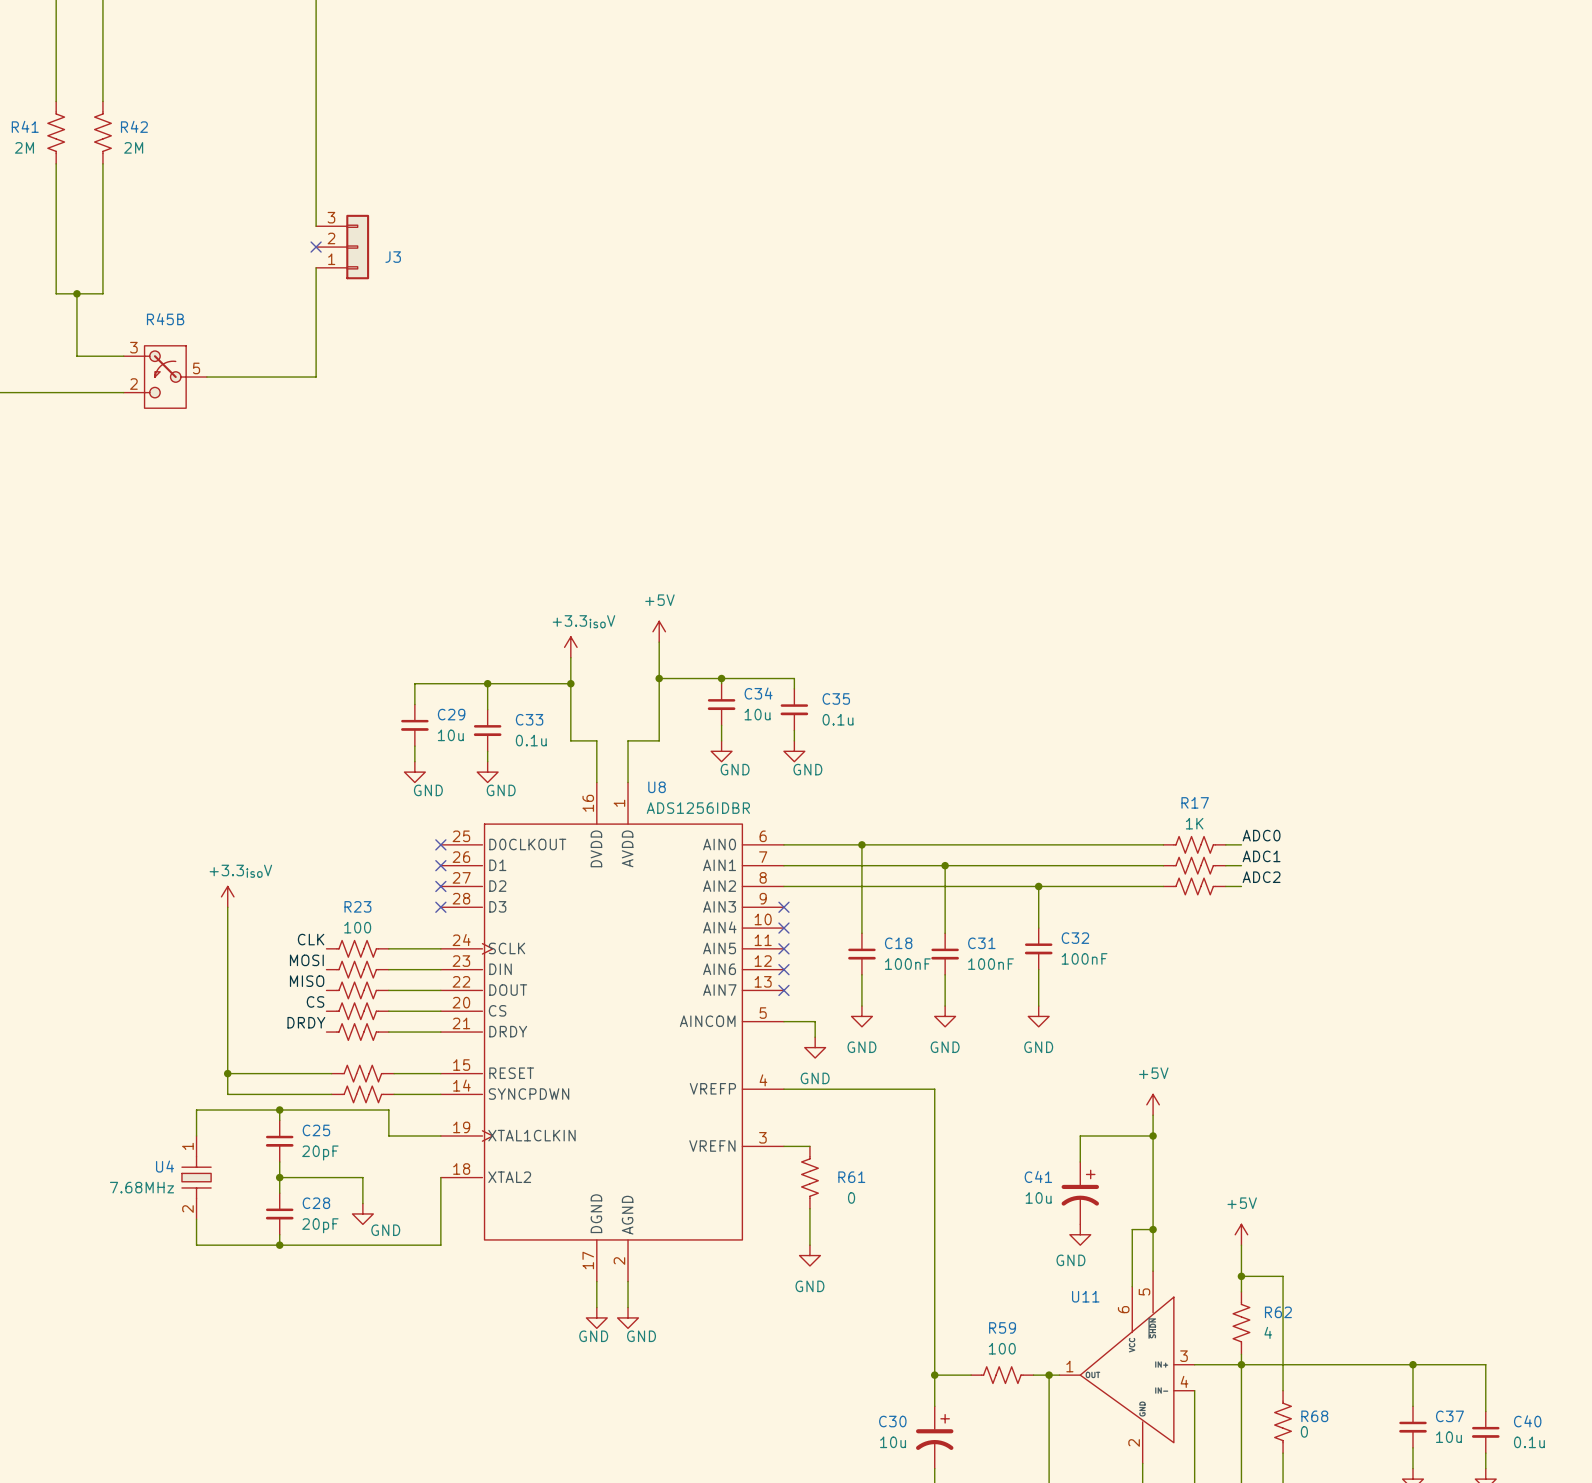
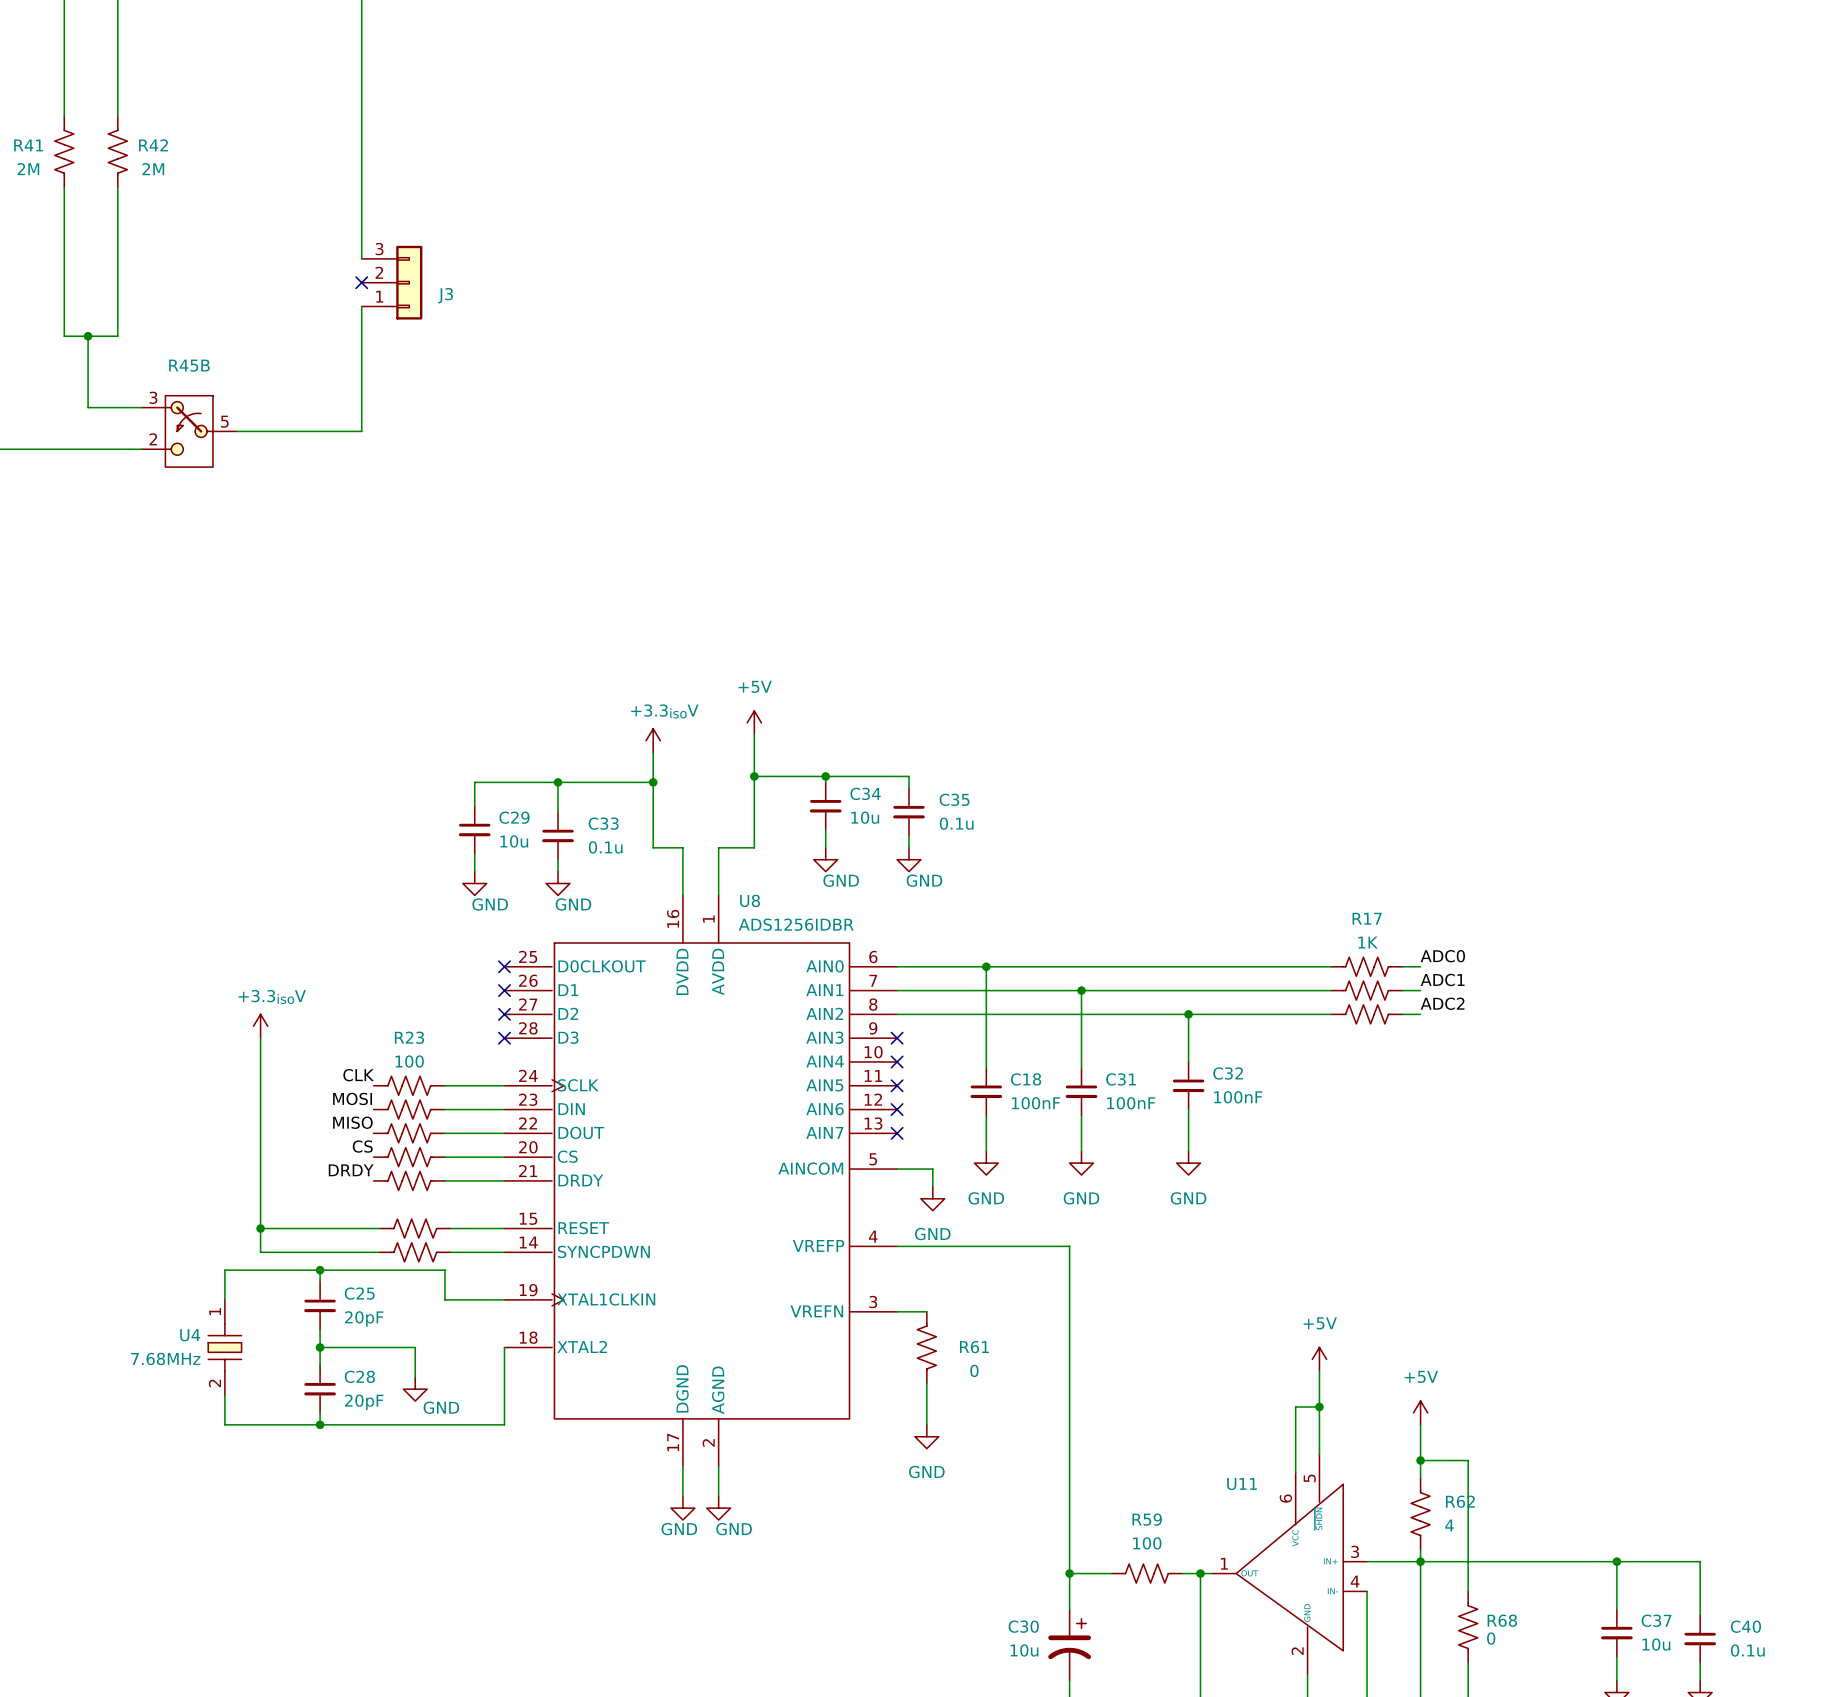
power symbol position: +5V (1153, 1104) -> +5V (1319, 1359)
wire: (1153, 1115) (1153, 1198) -> none
wire: (1153, 1135) (1080, 1135) (1080, 1161) -> none
junction: (1153, 1135) -> none
C41: 10u (1080, 1193) -> none
power symbol: GND (1080, 1234) -> none

